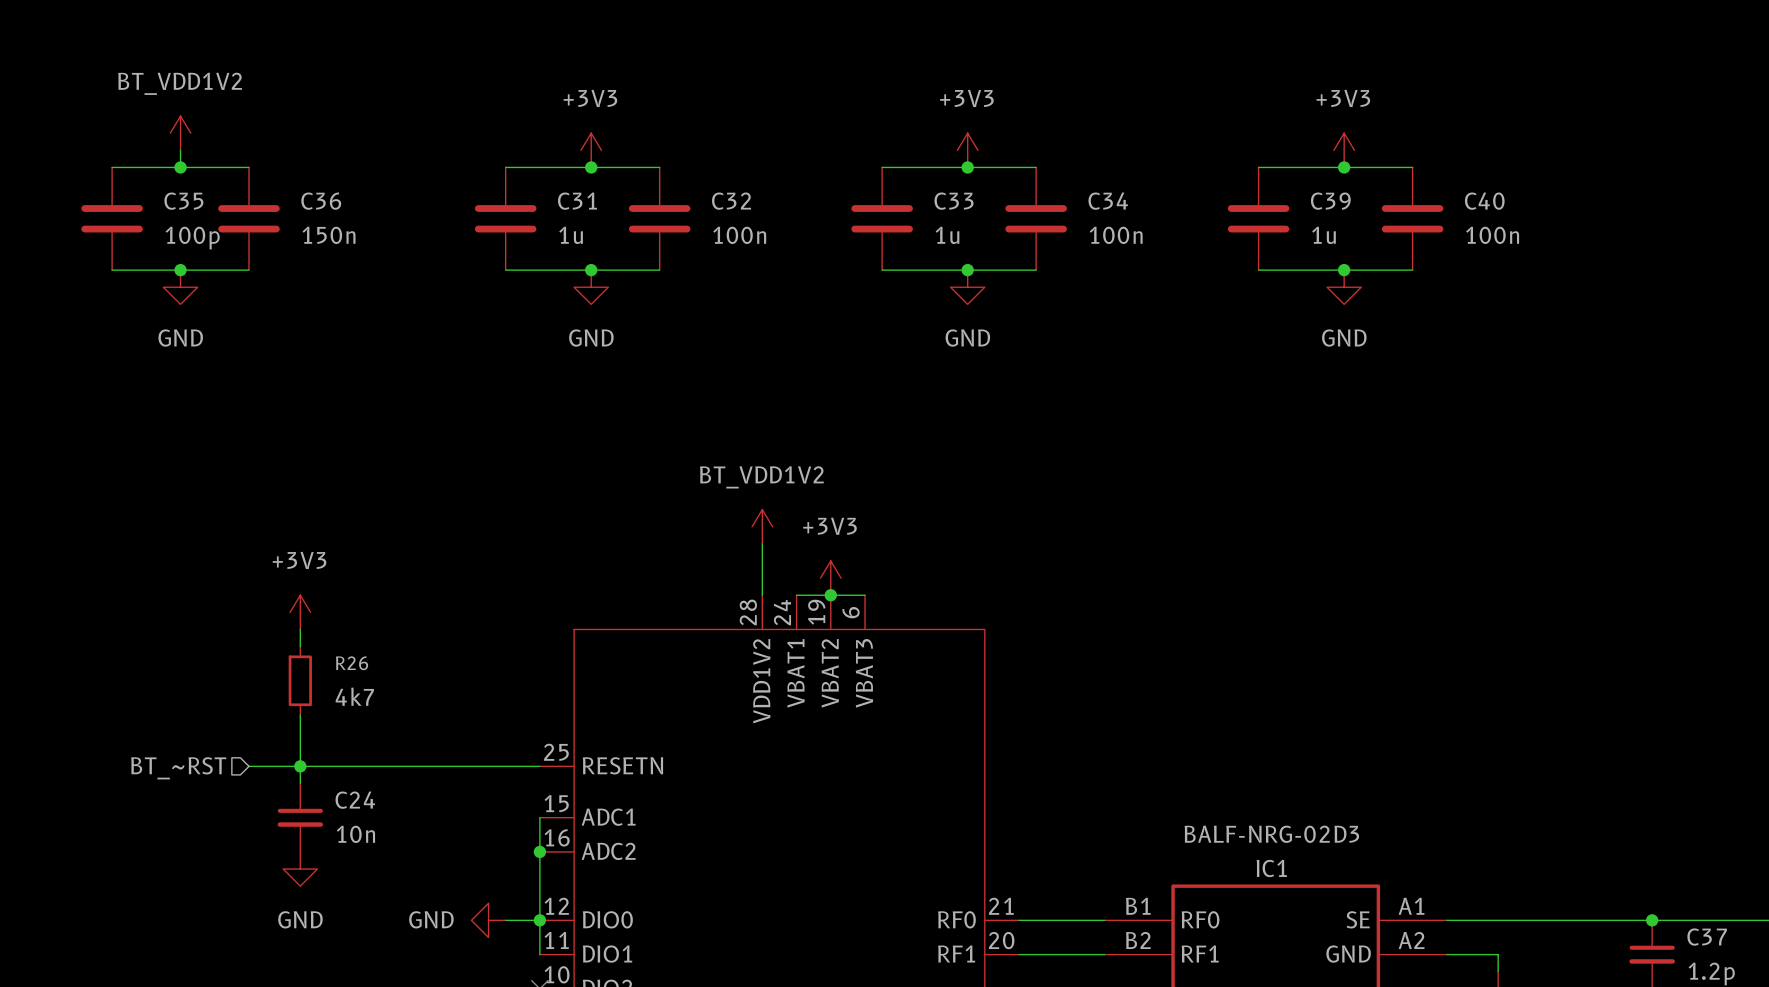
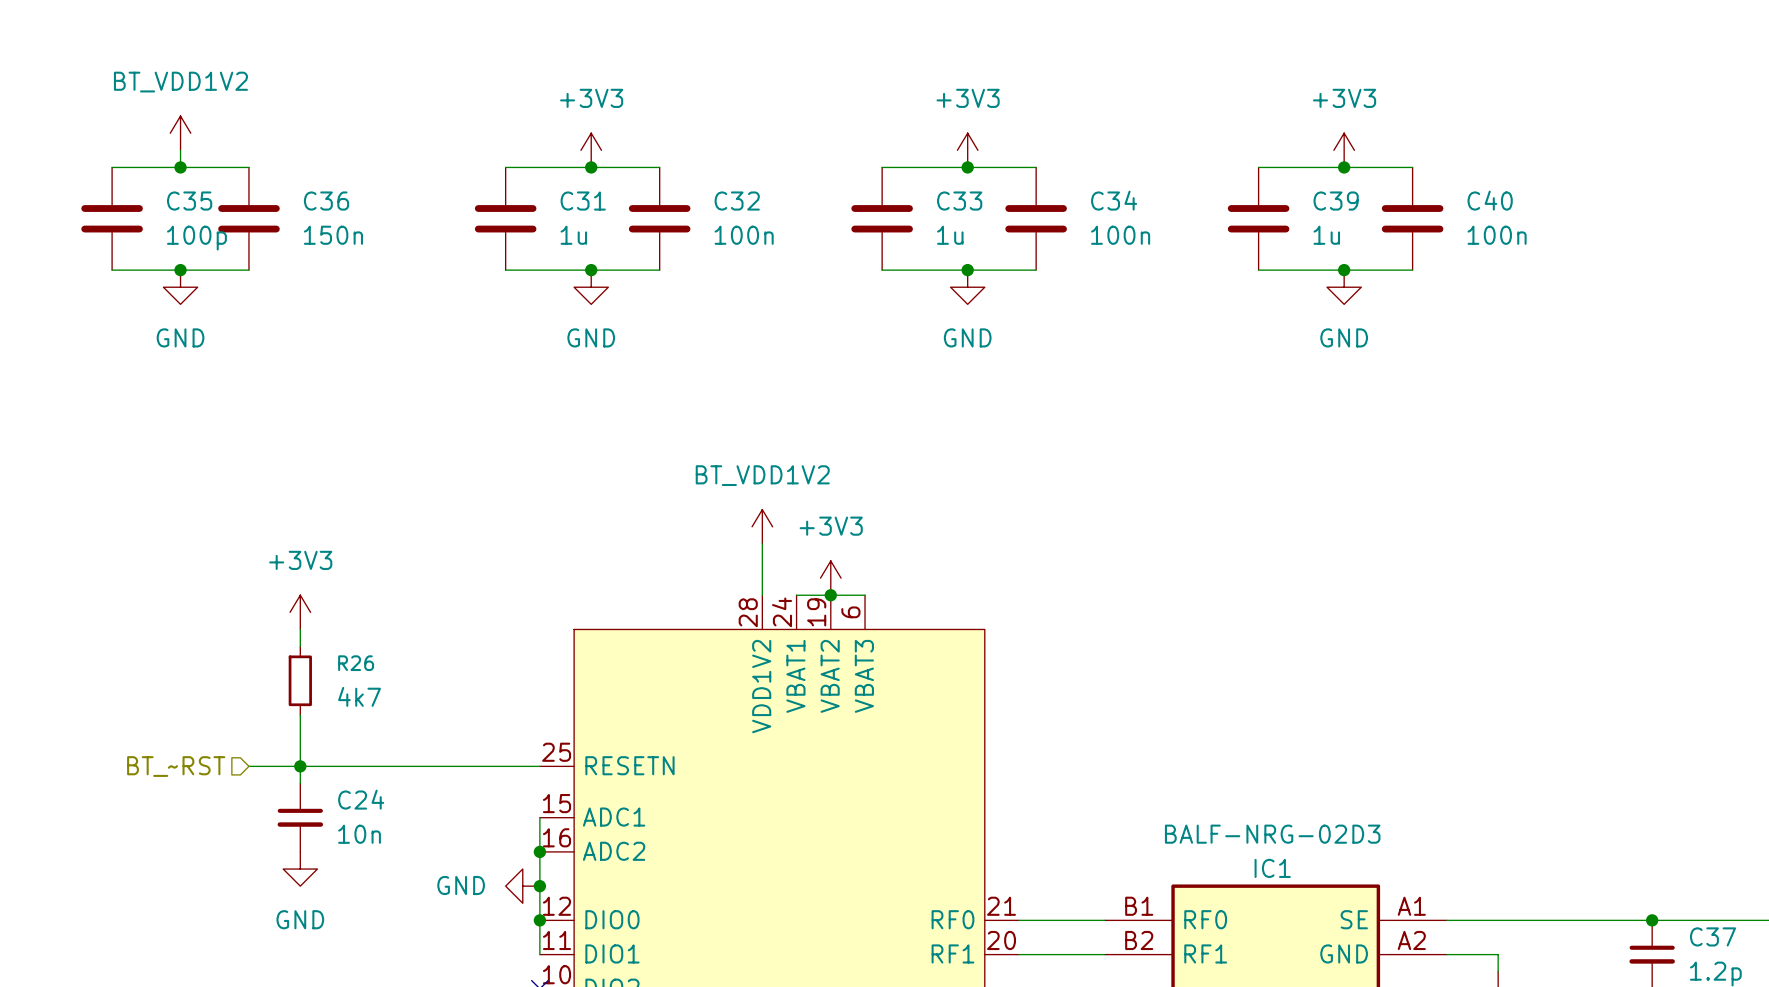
junction: none -> (539, 886)
power symbol position: GND (488, 920) -> GND (522, 886)
wire: (505, 920) (539, 920) -> none

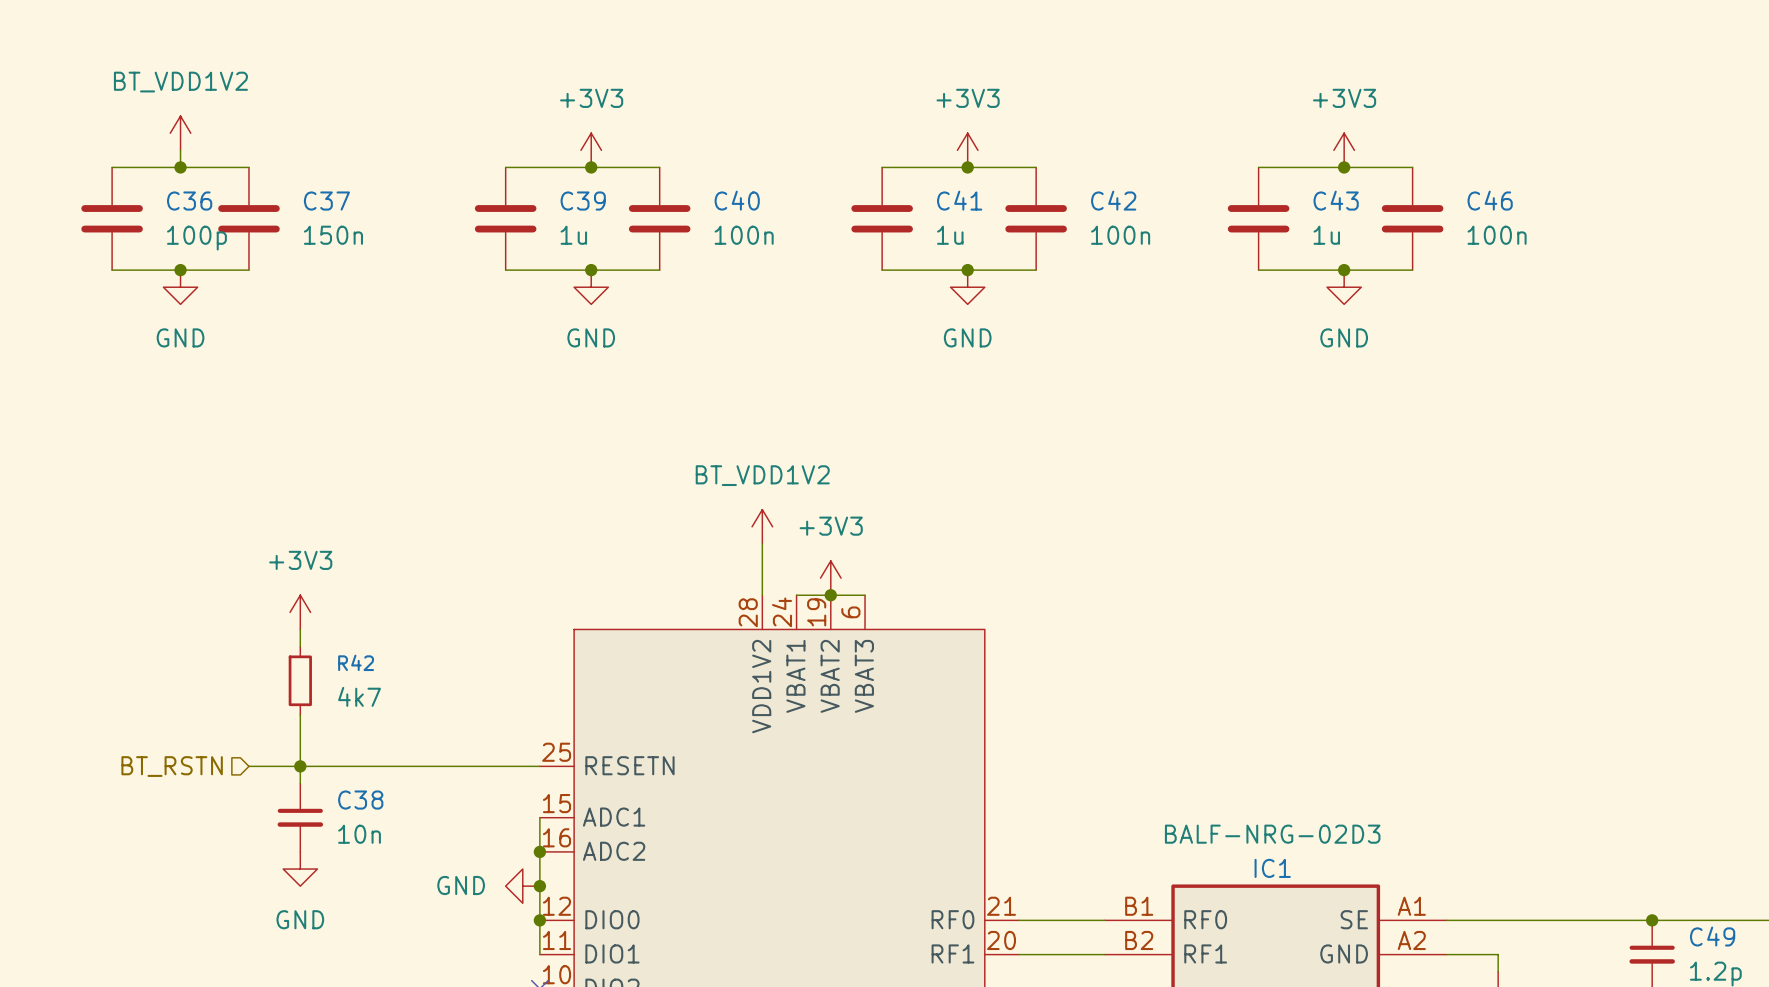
C34 name: C34 (1114, 200) -> C42 (1113, 200)
C40 name: C40 (1490, 200) -> C46 (1490, 200)
C35 name: C35 (189, 201) -> C36 (189, 201)
C36 name: C36 (326, 201) -> C37 (326, 201)
C31 name: C31 (583, 201) -> C39 (583, 201)
C32 name: C32 (737, 201) -> C40 (737, 200)
C33 name: C33 (959, 201) -> C41 (959, 200)
C39 name: C39 (1336, 201) -> C43 (1336, 200)
R26 name: R26 (356, 663) -> R42 (356, 662)
hierarchical label: BT_~RST (176, 766) -> BT_RSTN (172, 766)
C24 name: C24 (361, 799) -> C38 (360, 800)
C37 name: C37 (1713, 936) -> C49 (1712, 936)

